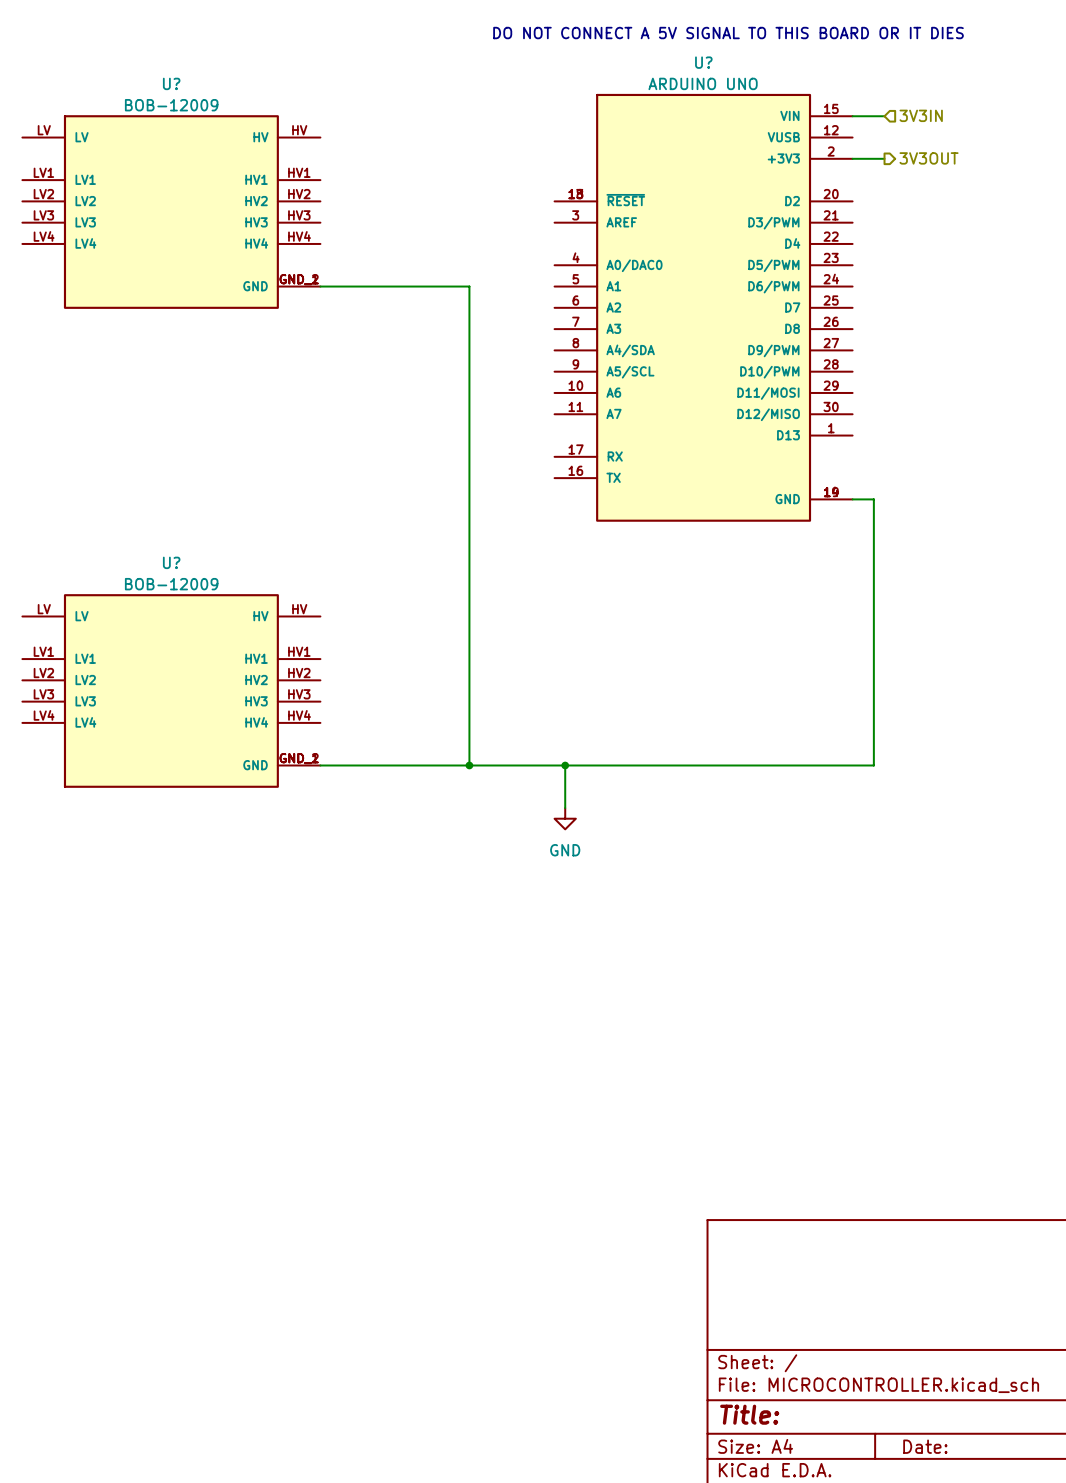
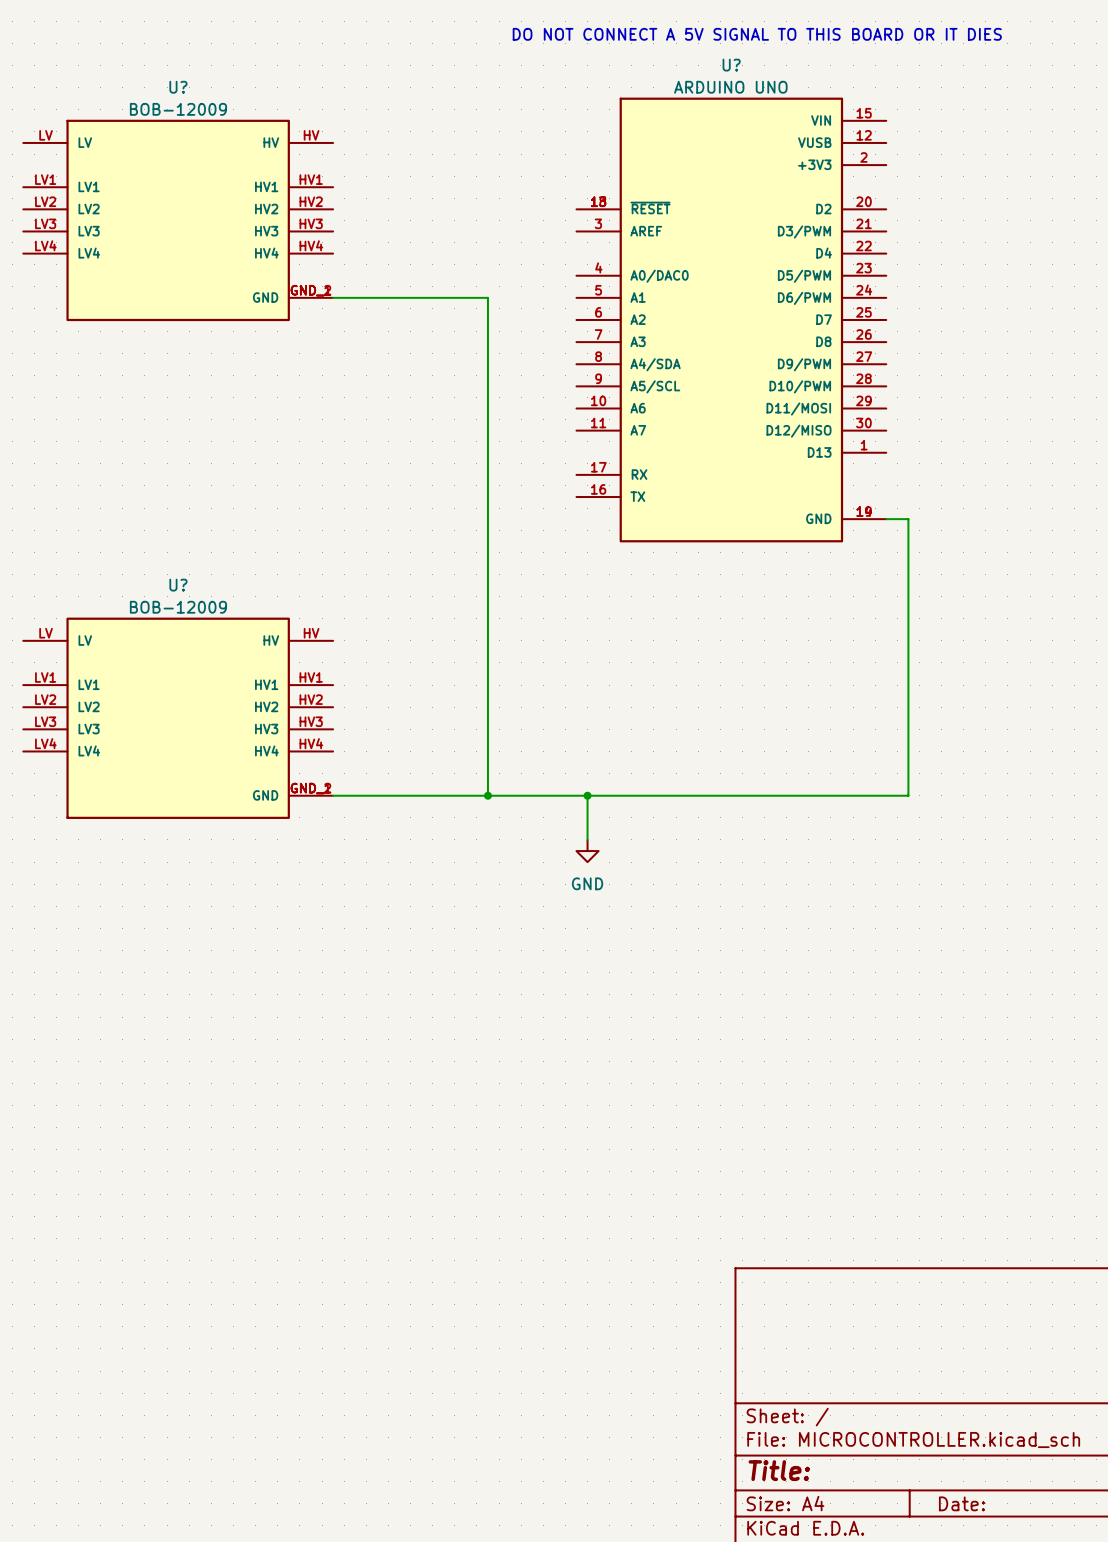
hierarchical label: 3V3IN (921, 115) -> none
wire: (852, 116) (884, 116) -> none
wire: (852, 158) (884, 158) -> none
hierarchical label: 3V3OUT (929, 158) -> none

